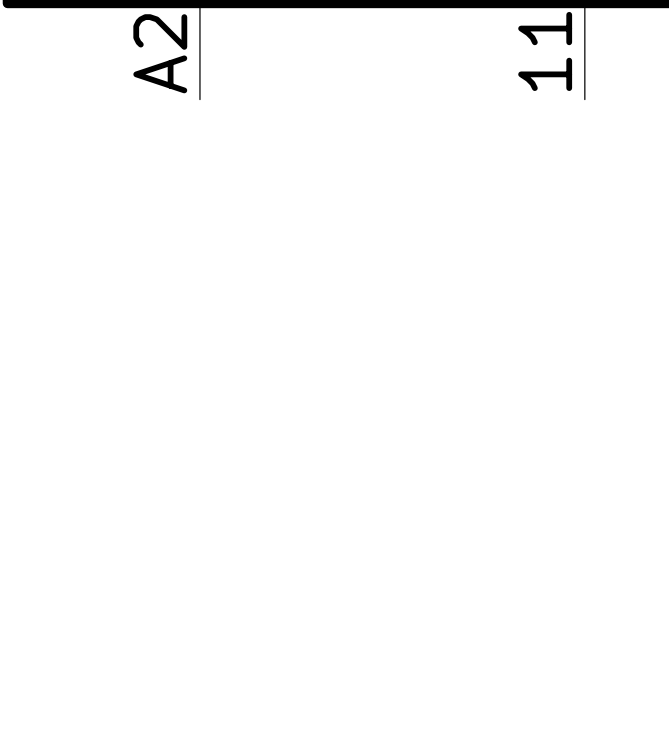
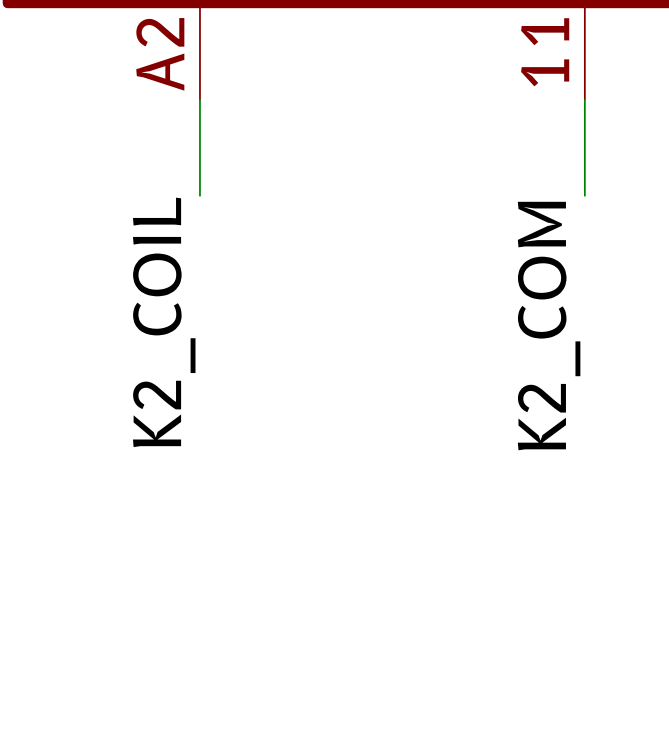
wire: none -> (199, 99) (199, 195)
wire: none -> (584, 99) (584, 195)
label: none -> K2_COIL (164, 322)
label: none -> K2_COM (549, 326)

